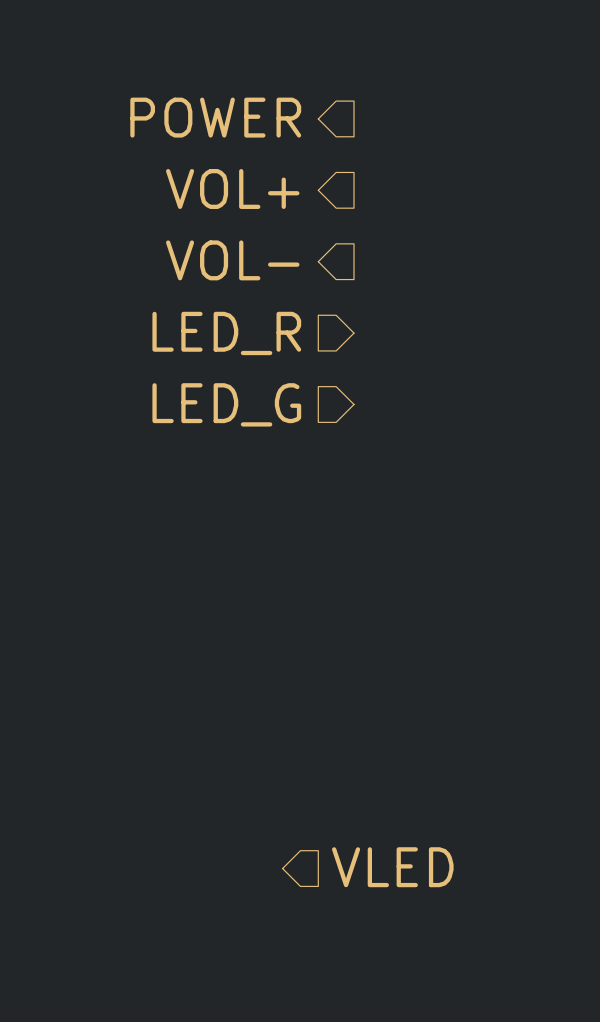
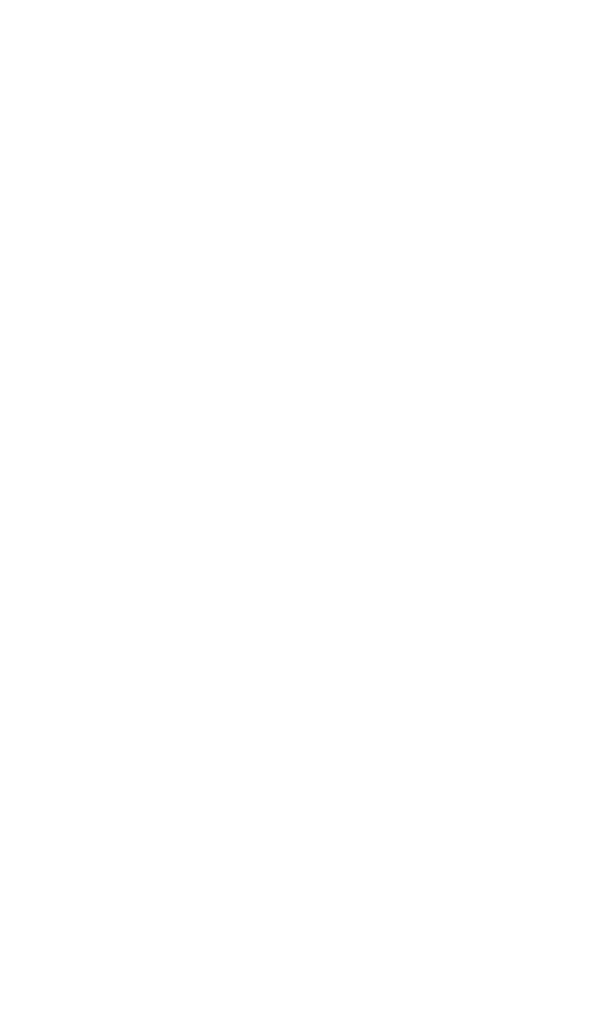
hierarchical label: POWER (215, 117) -> none
hierarchical label: VOL+ (232, 188) -> none
hierarchical label: VOL- (232, 260) -> none
hierarchical label: LED_R (226, 333) -> none
hierarchical label: LED_G (226, 404) -> none
hierarchical label: VLED (392, 867) -> none

